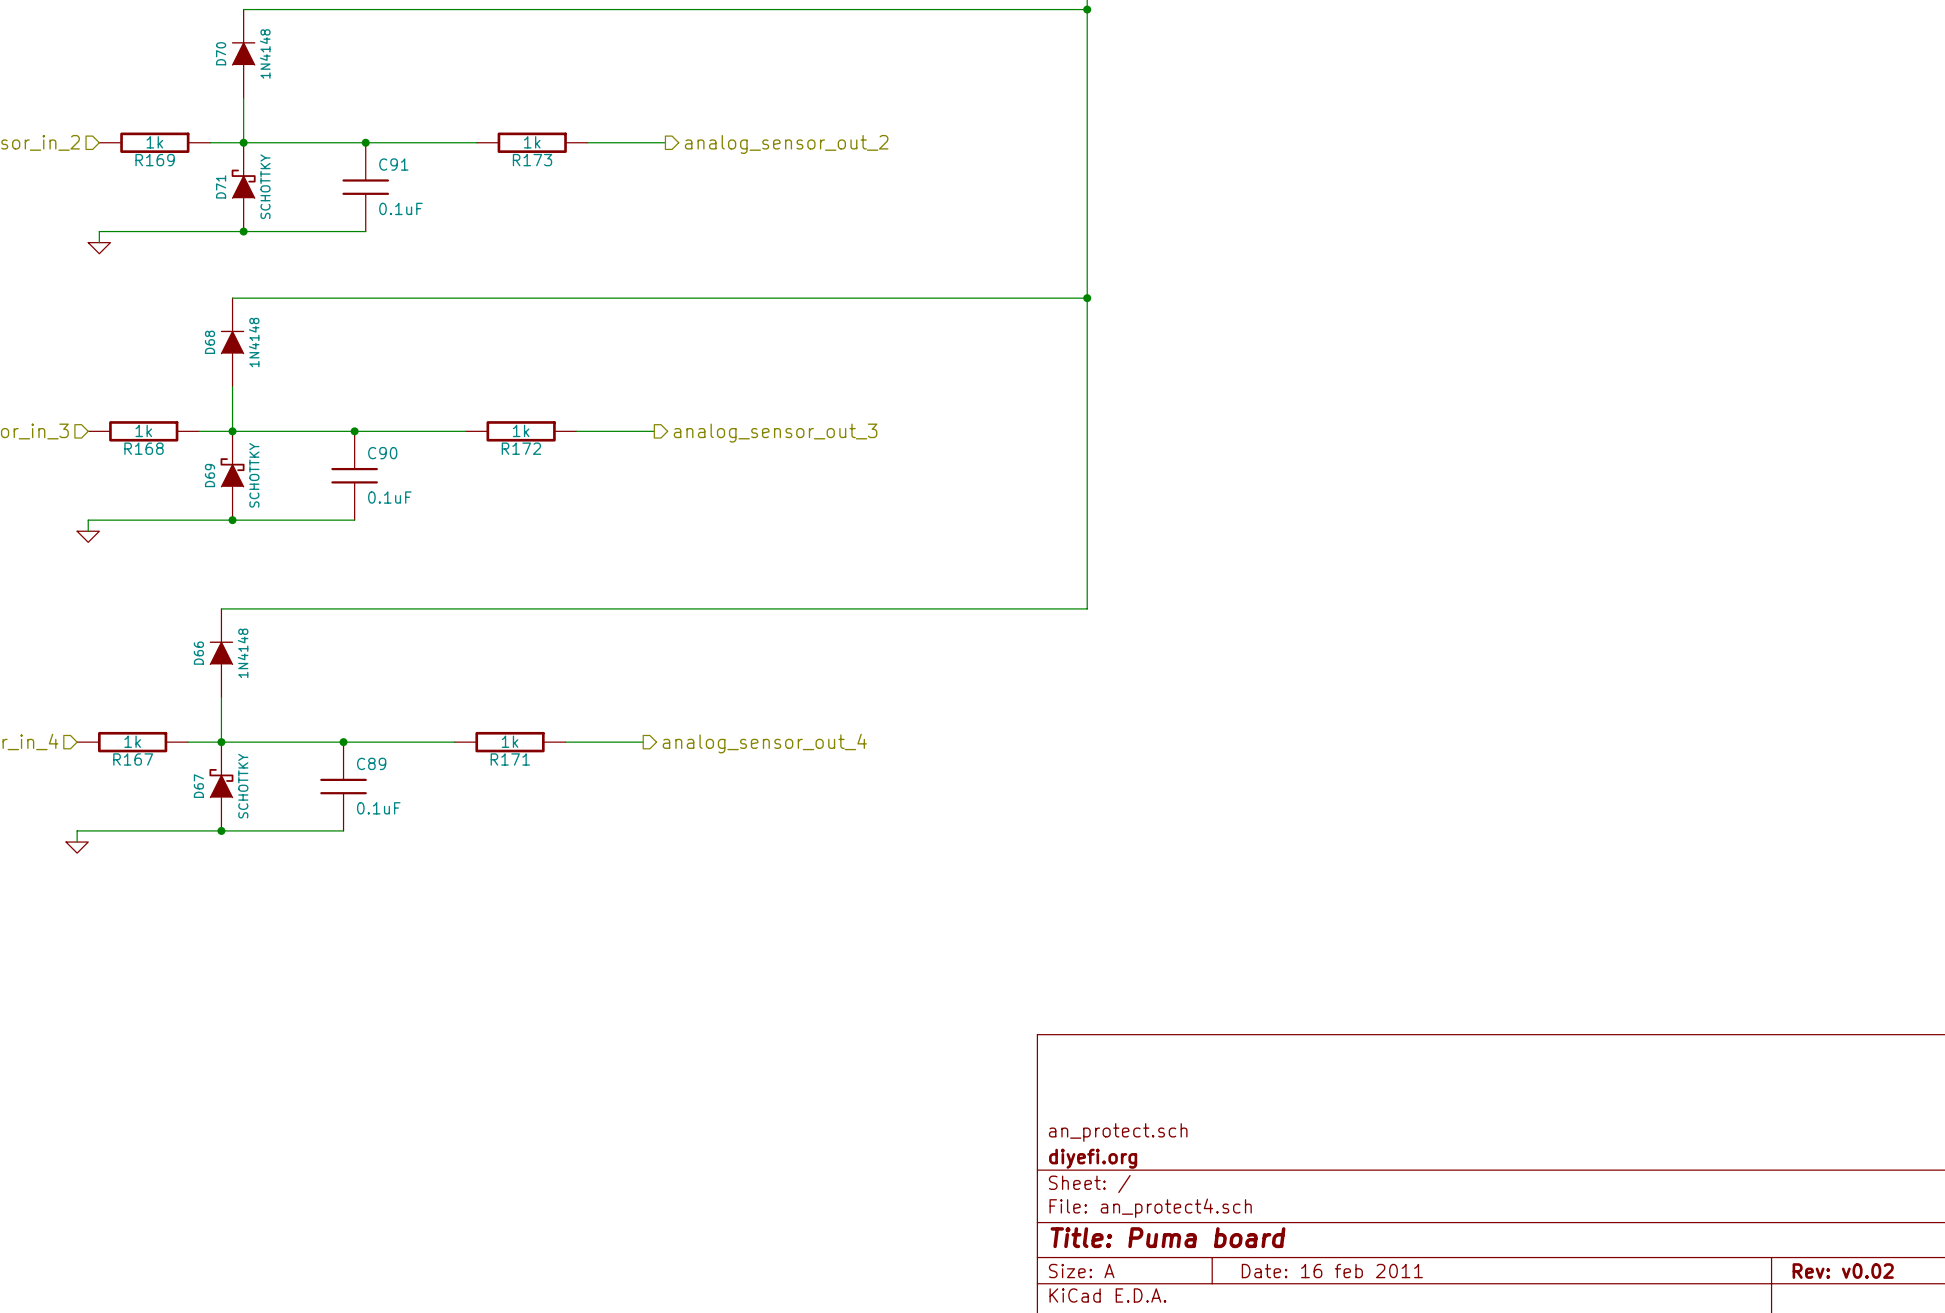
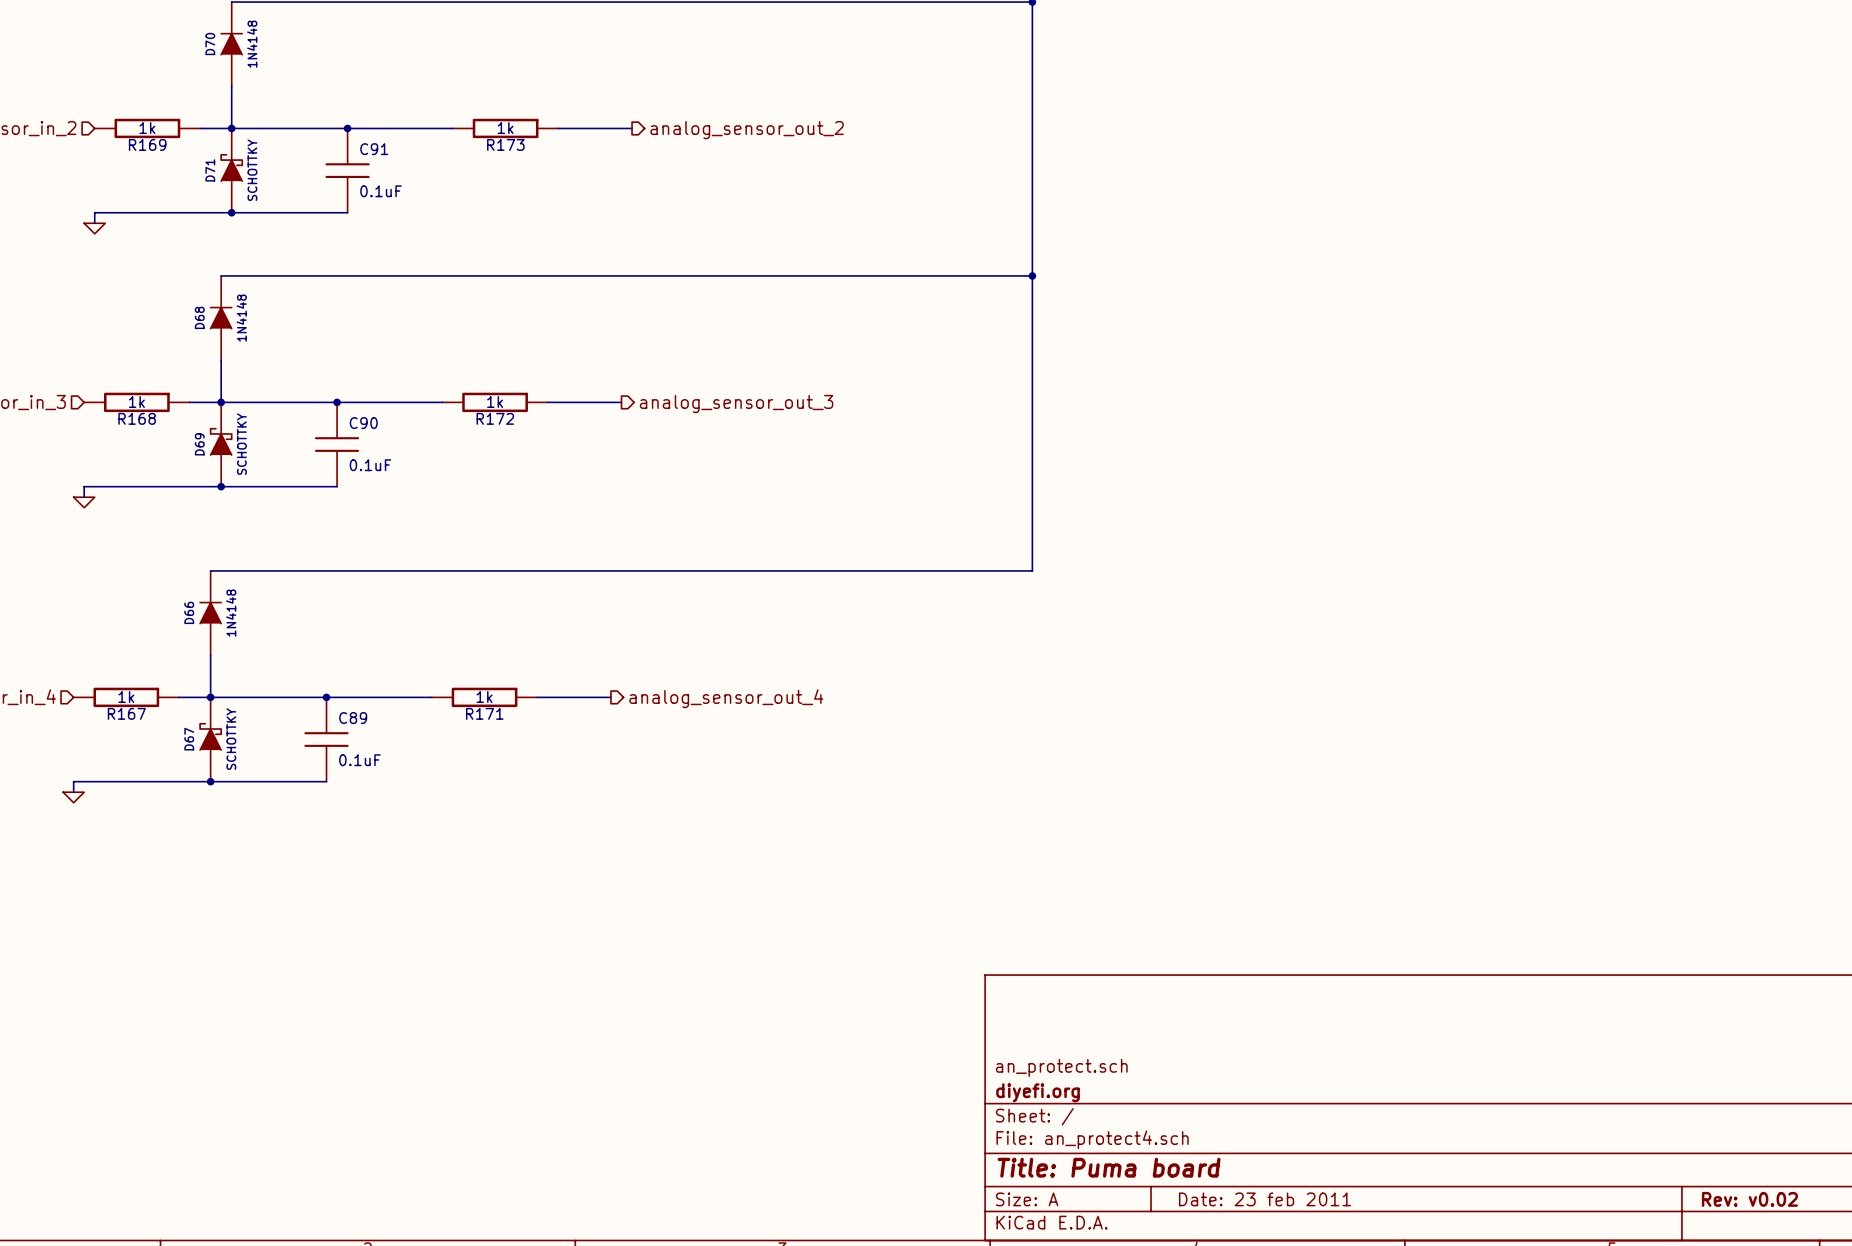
title block: Date: 16 feb 2011 (1332, 1271) -> Date: 23 feb 2011 (1265, 1199)

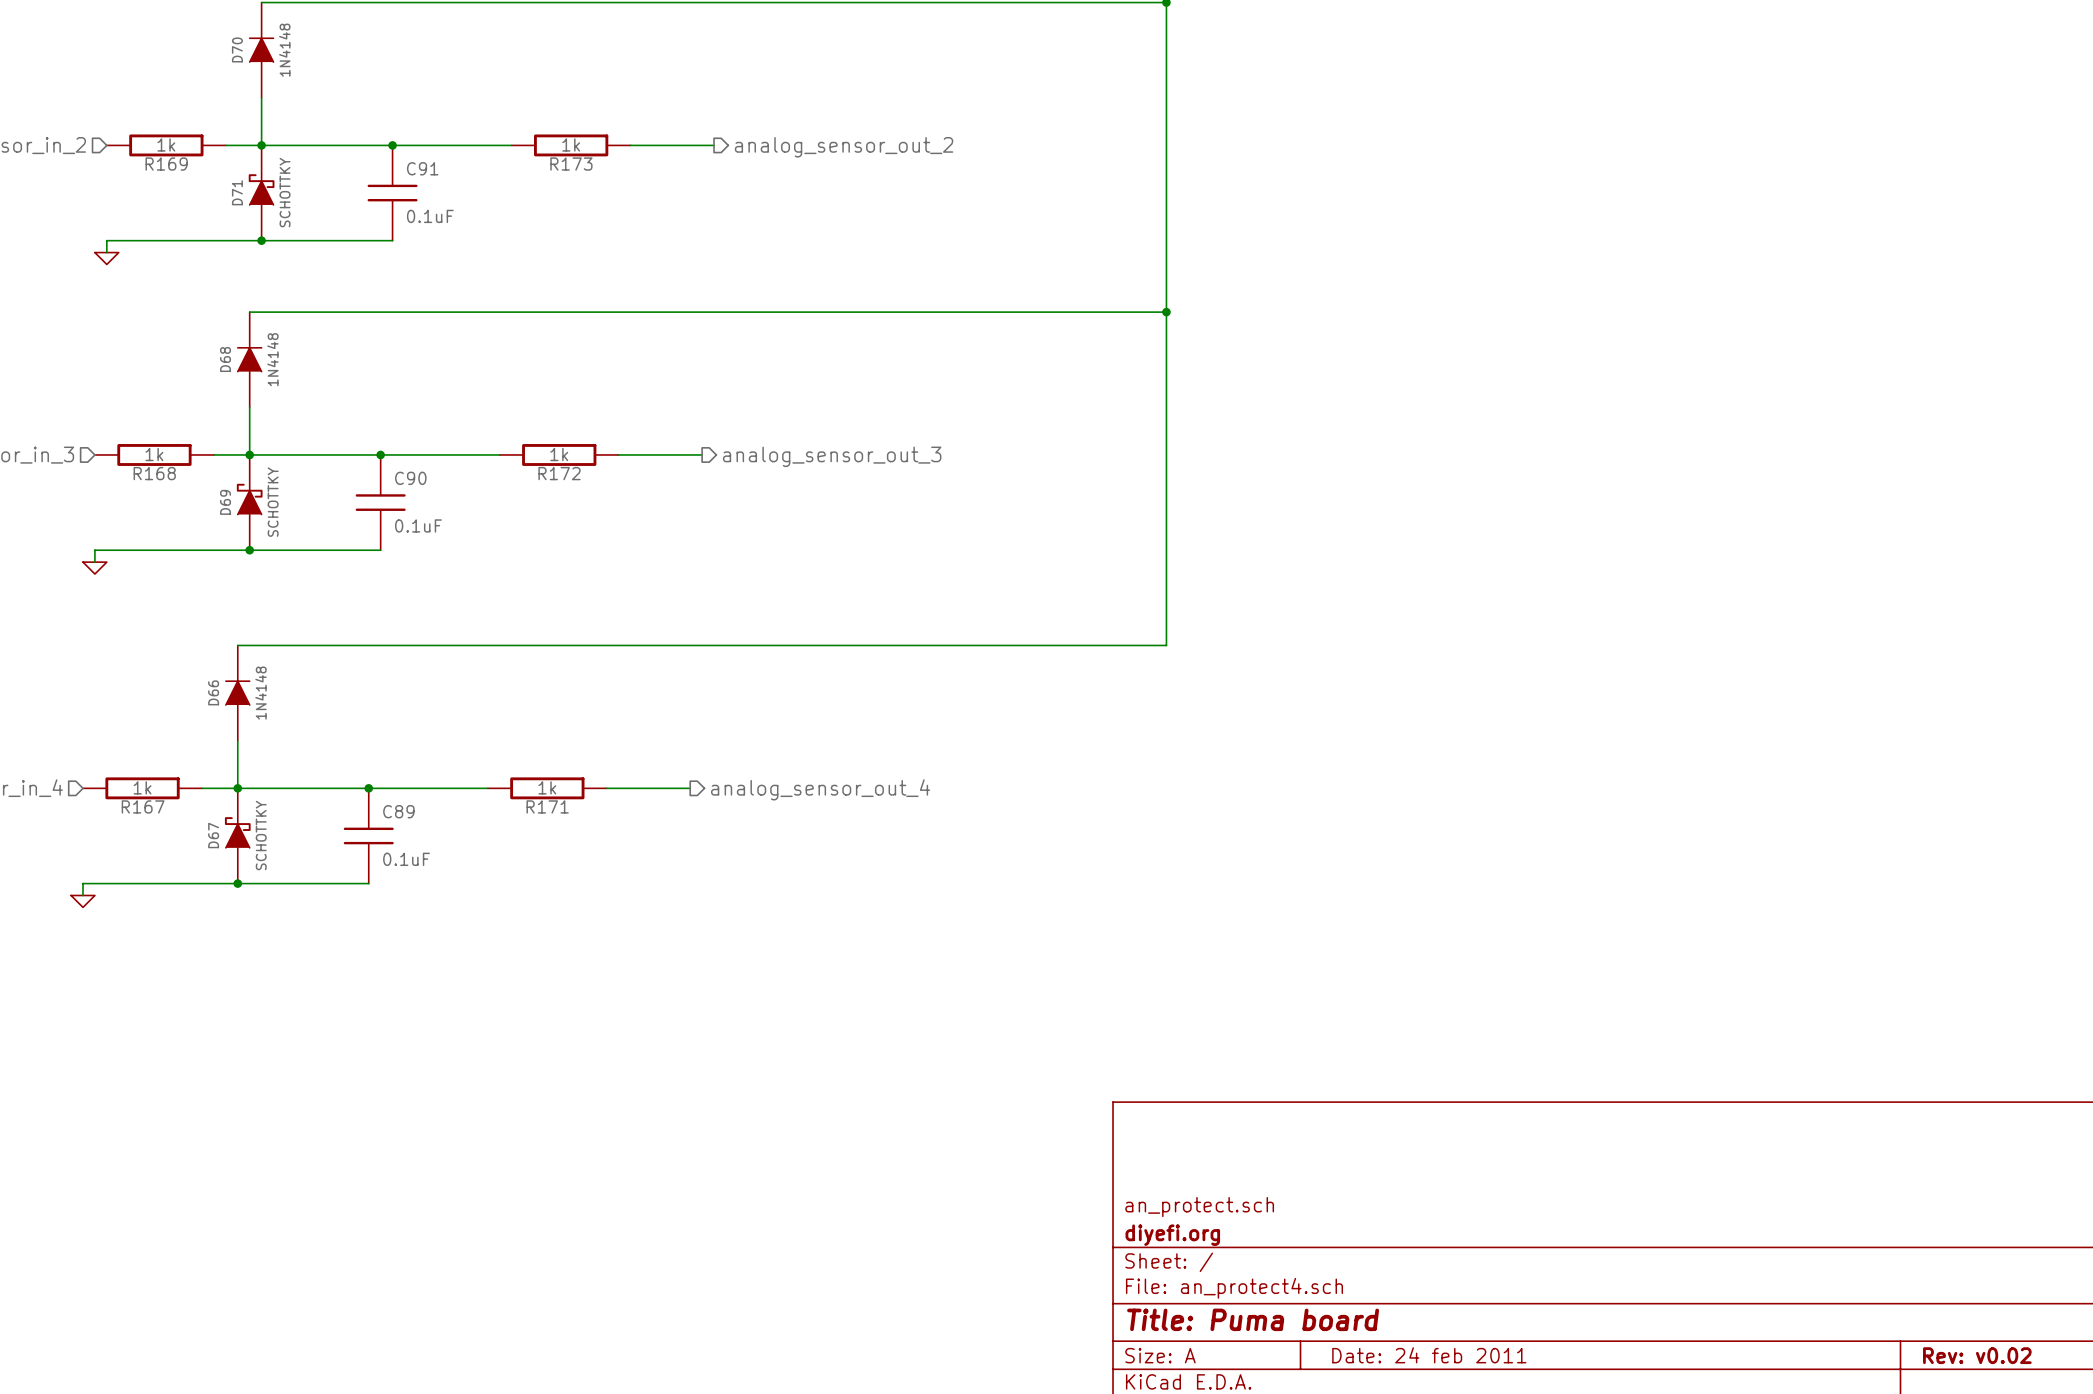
title block: Date: 23 feb 2011 (1265, 1199) -> Date: 24 feb 2011 (1429, 1355)

